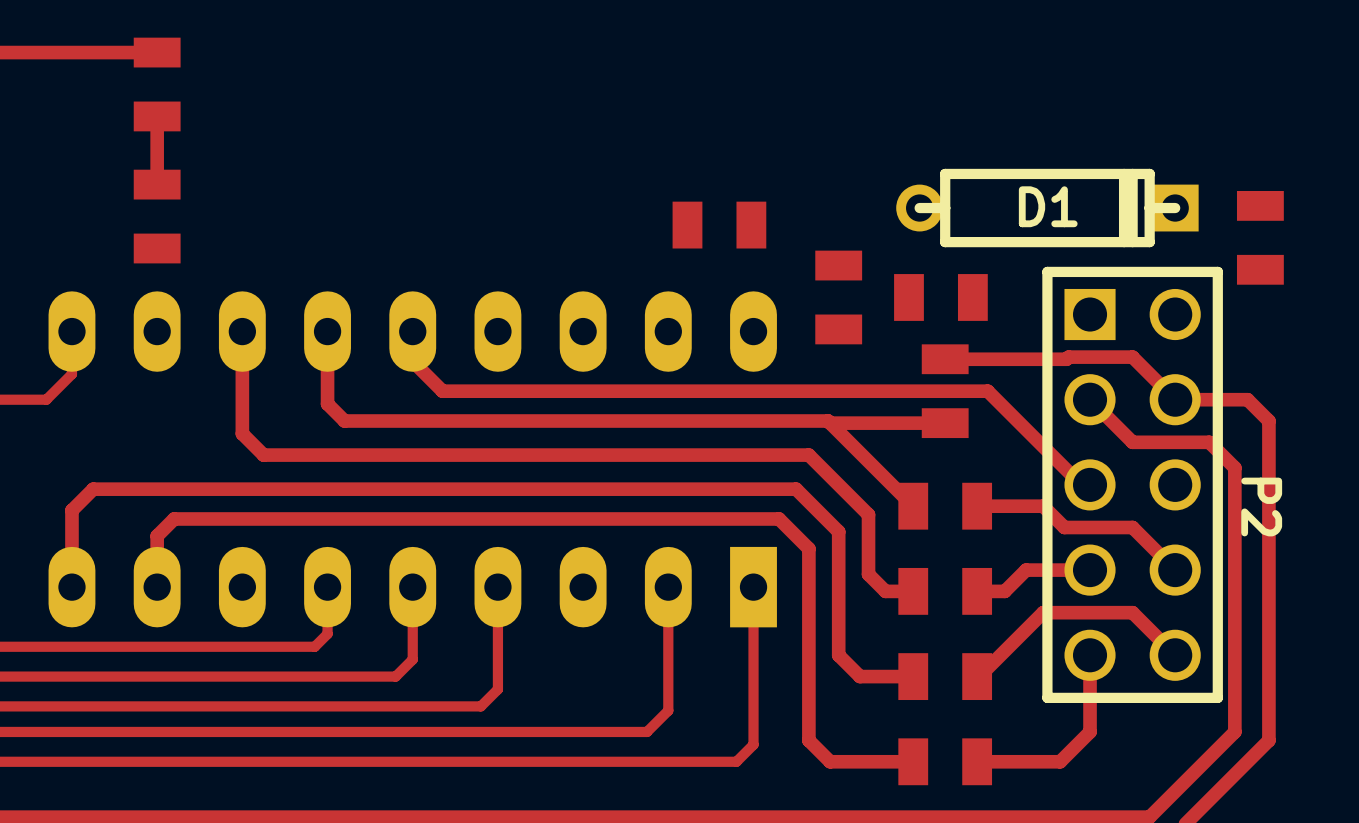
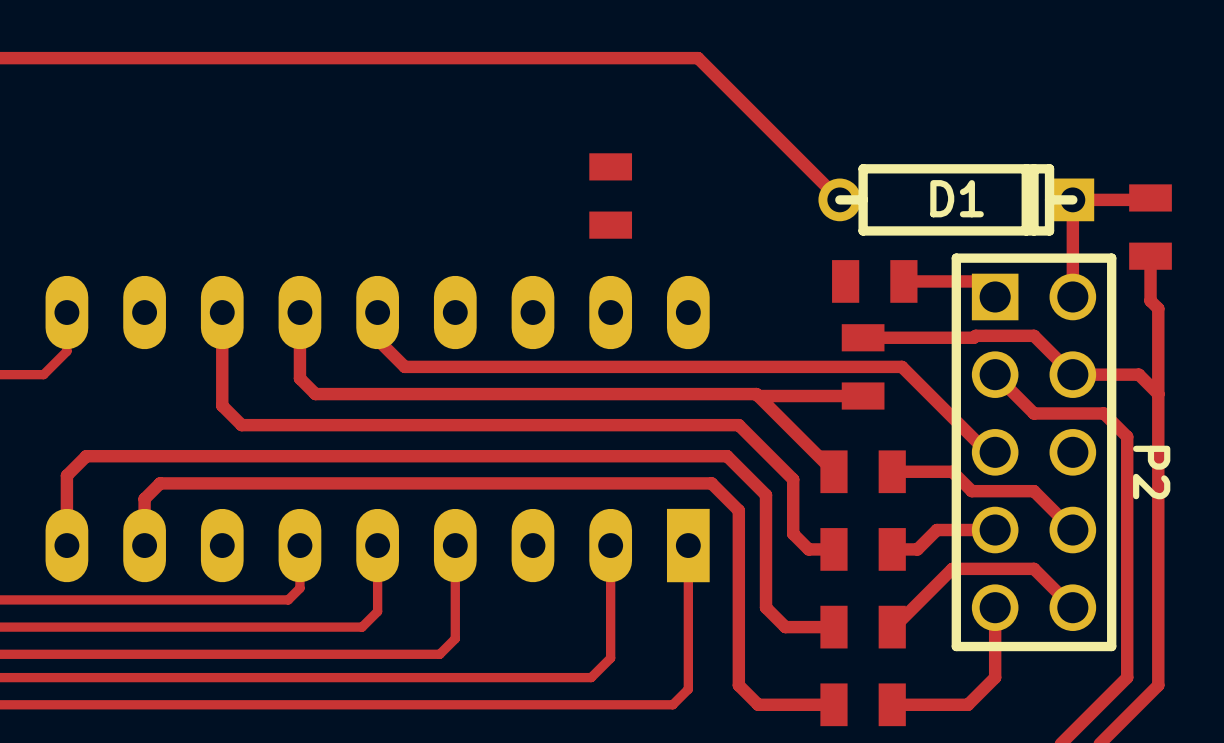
top track: none -> (144, 58) (698, 58) (839, 199)
part: (157, 84) -> none
top track: (157, 112) (157, 184) -> none
top track: none -> (1150, 197) (1148, 199) (1072, 199) (1072, 296)
part: (157, 216) -> none
part rotation: 0° (719, 225) -> 90° clockwise (610, 196)
top track: none -> (1150, 256) (1150, 300) (1158, 308) (1158, 394)
part: (838, 297) -> none
part position: (940, 297) -> (874, 281)
top track: none -> (903, 281) (979, 281) (995, 296)

